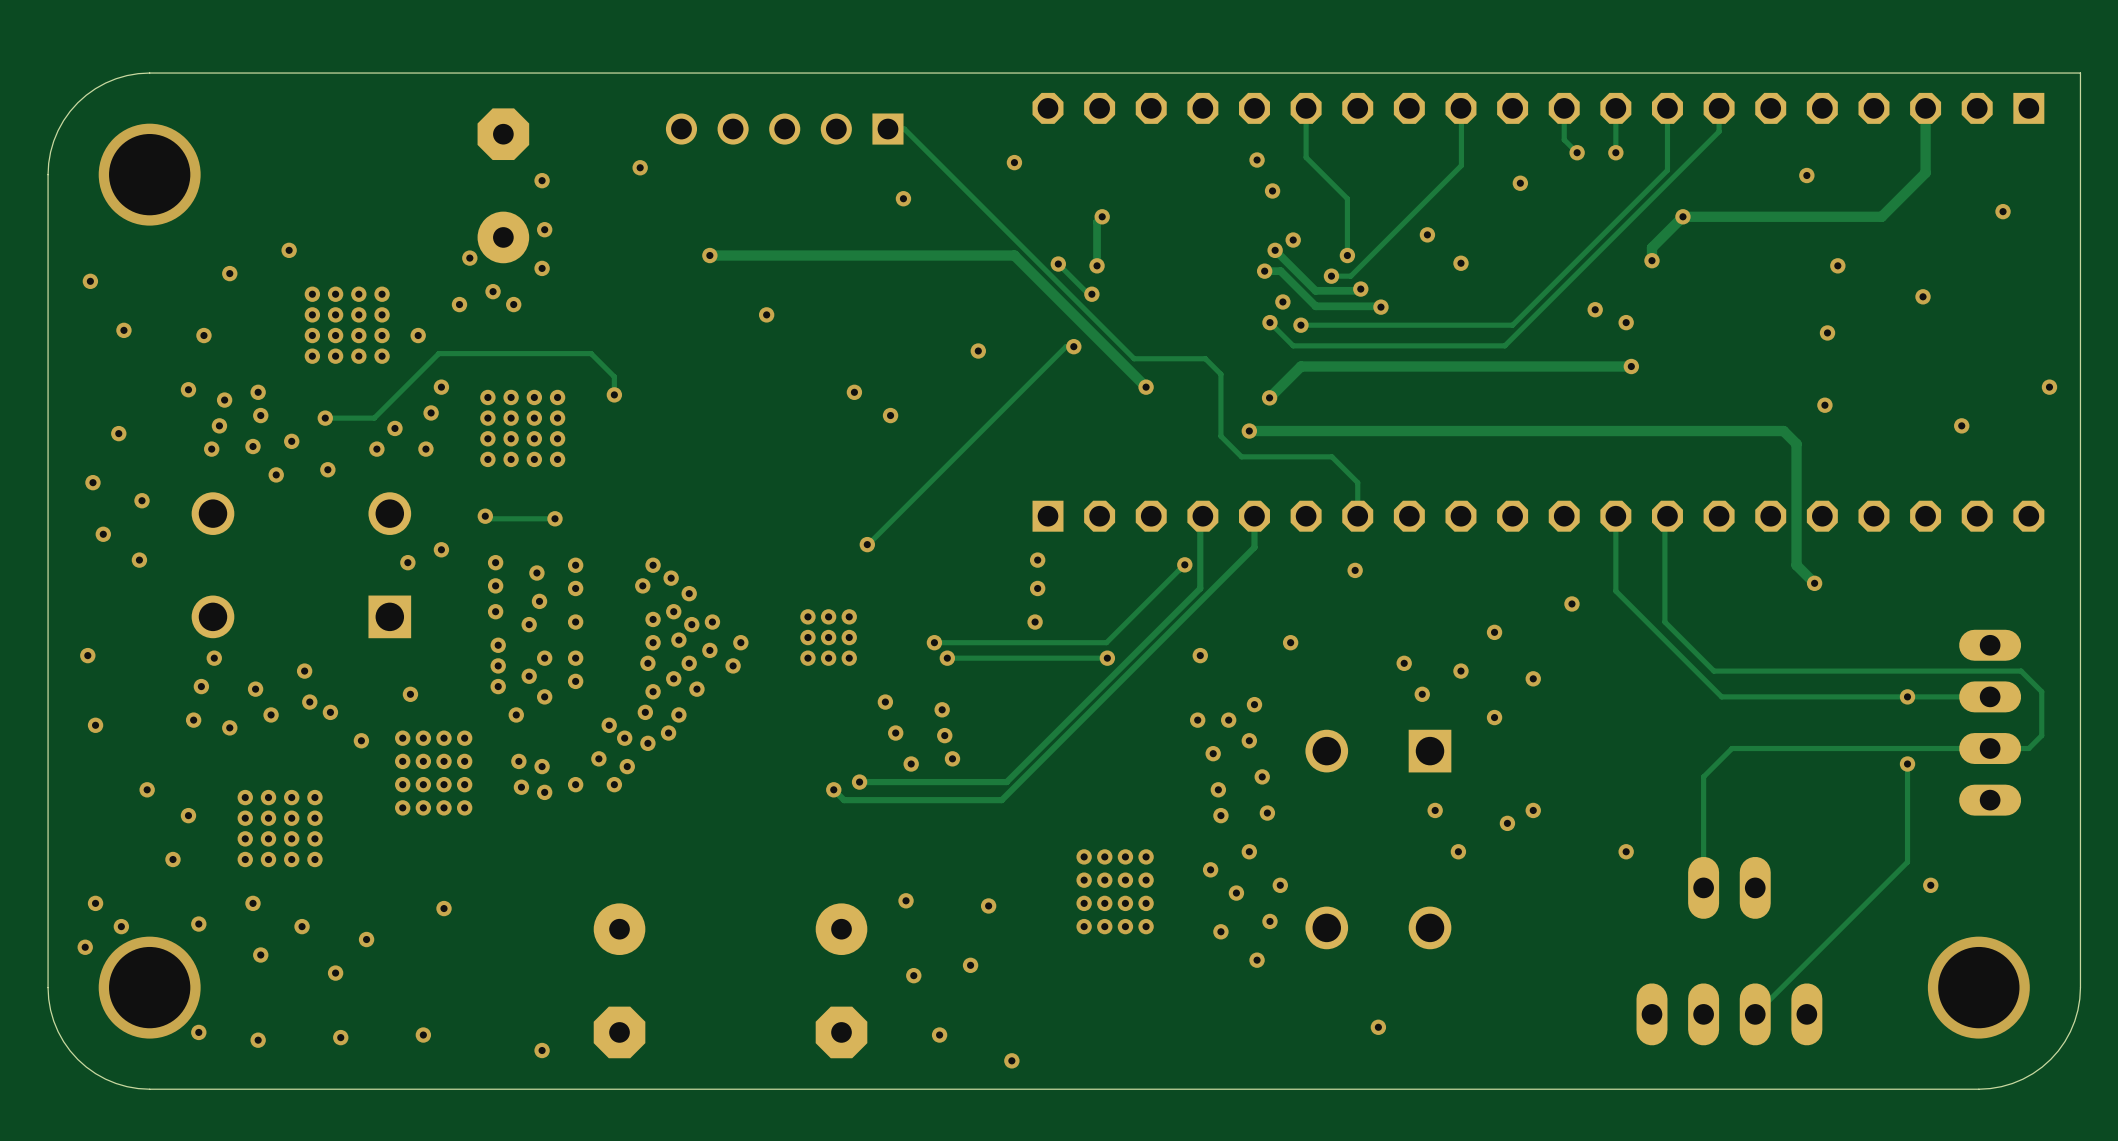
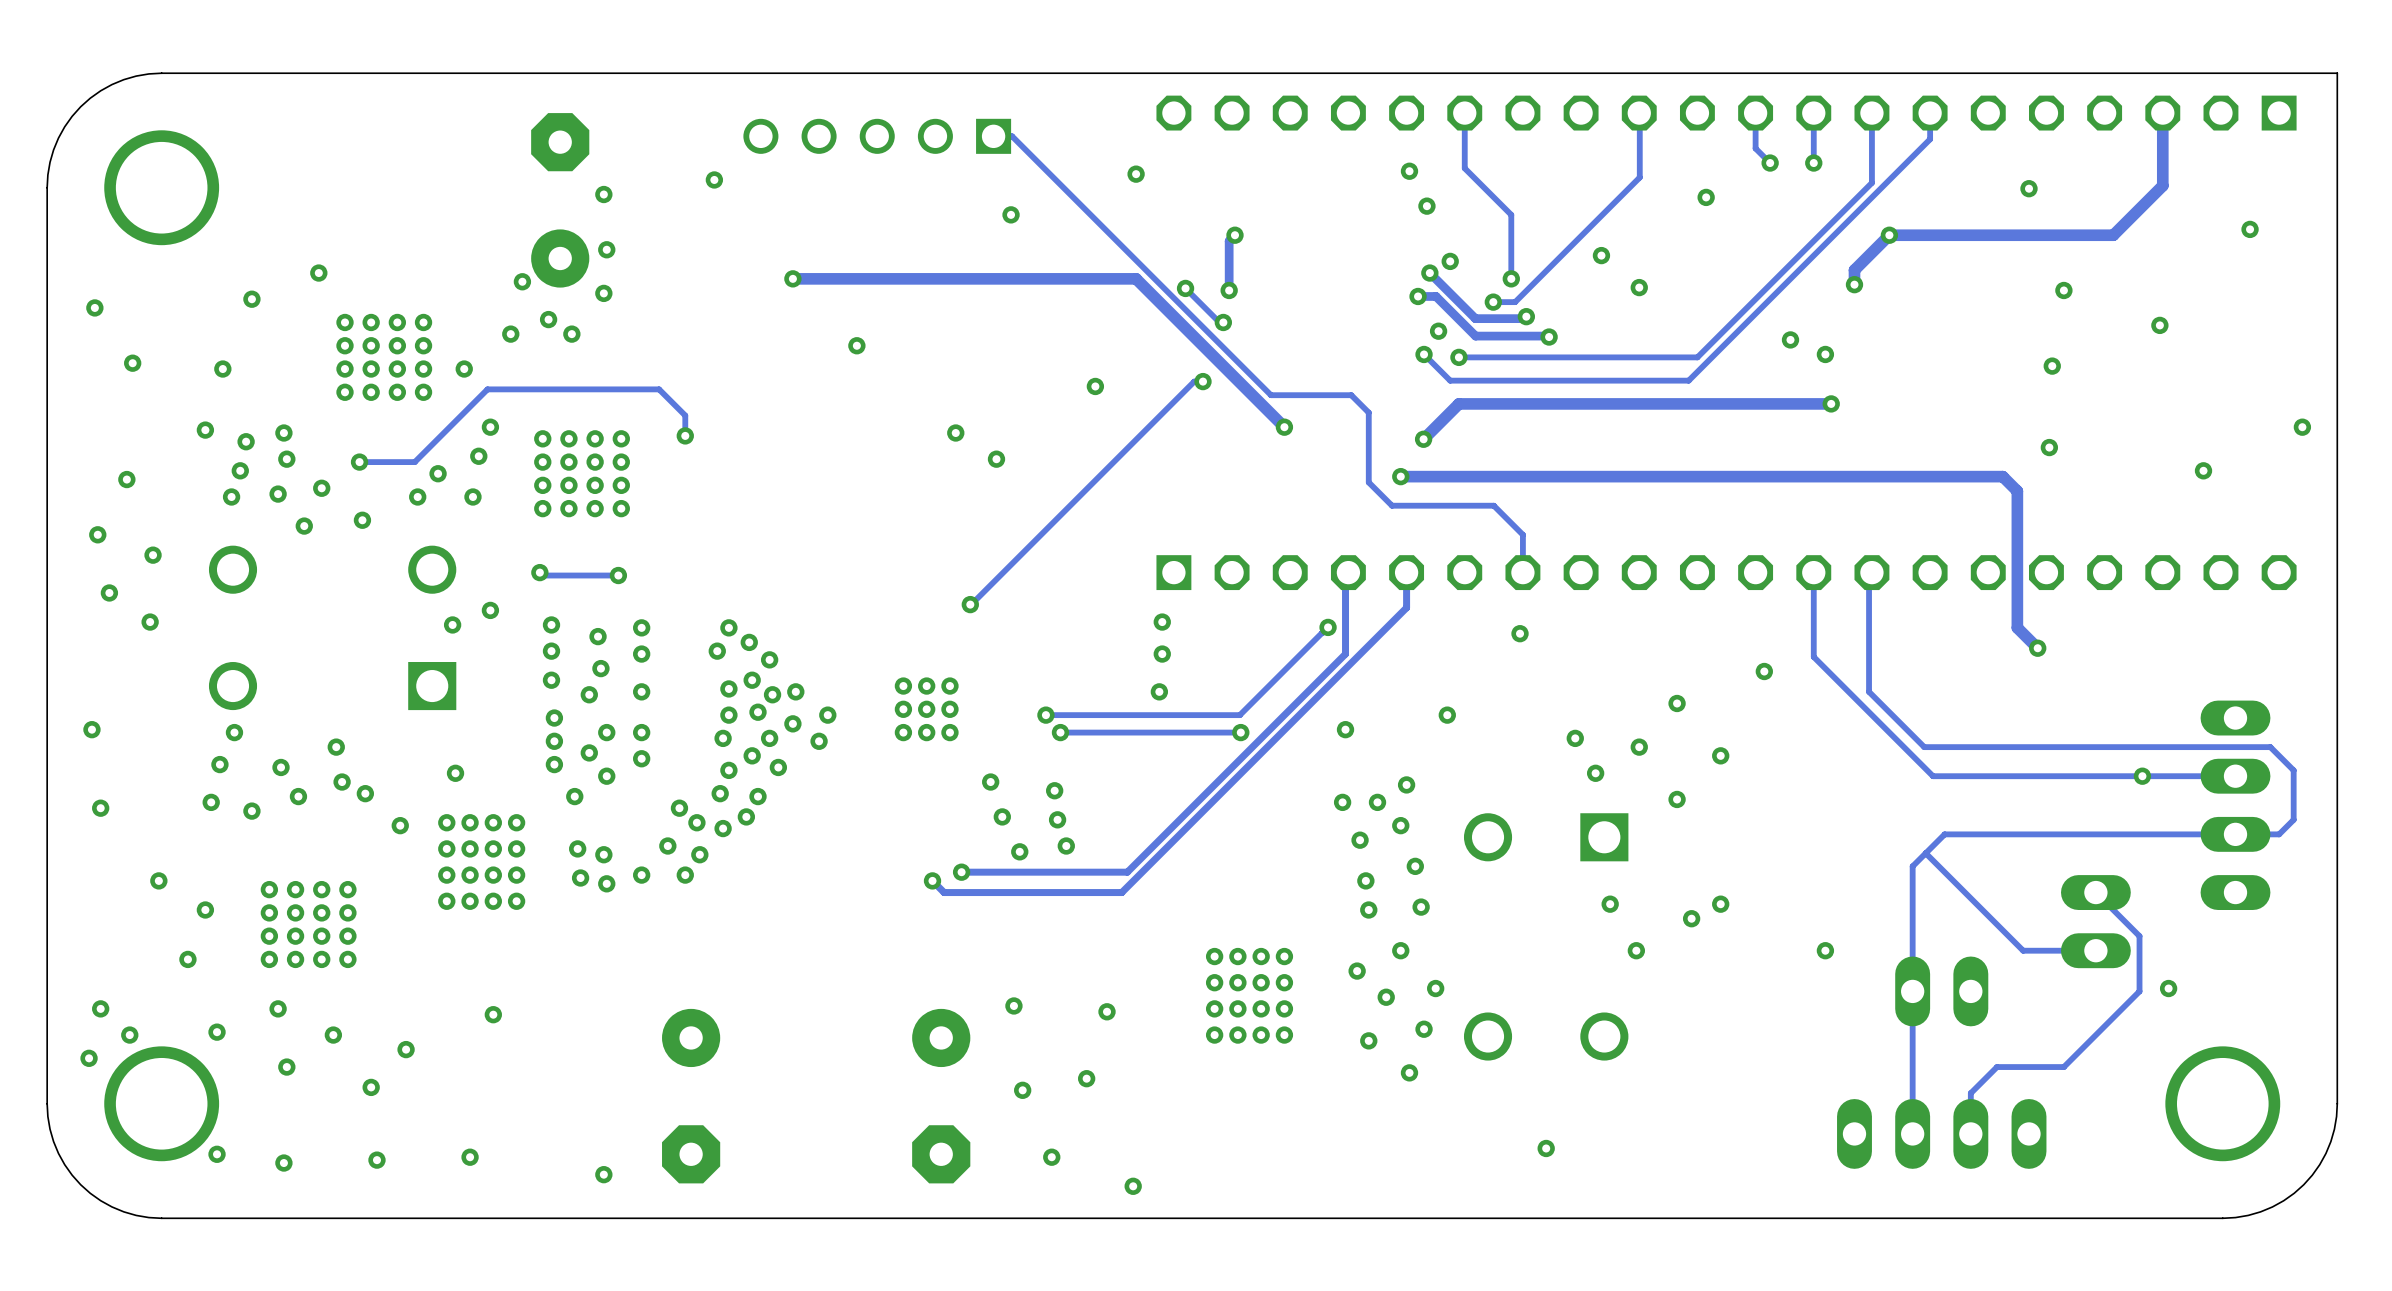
track: (1907, 764) (1907, 862) (1755, 1014) -> (2095, 892) (2139, 936) (2139, 991) (2063, 1067) (1997, 1067) (1970, 1093) (1970, 1133)
via: (1907, 764) -> none
track: none -> (1925, 853) (2023, 950) (2095, 950)
part: none -> (2095, 921)
track: none -> (1912, 991) (1912, 1133)

